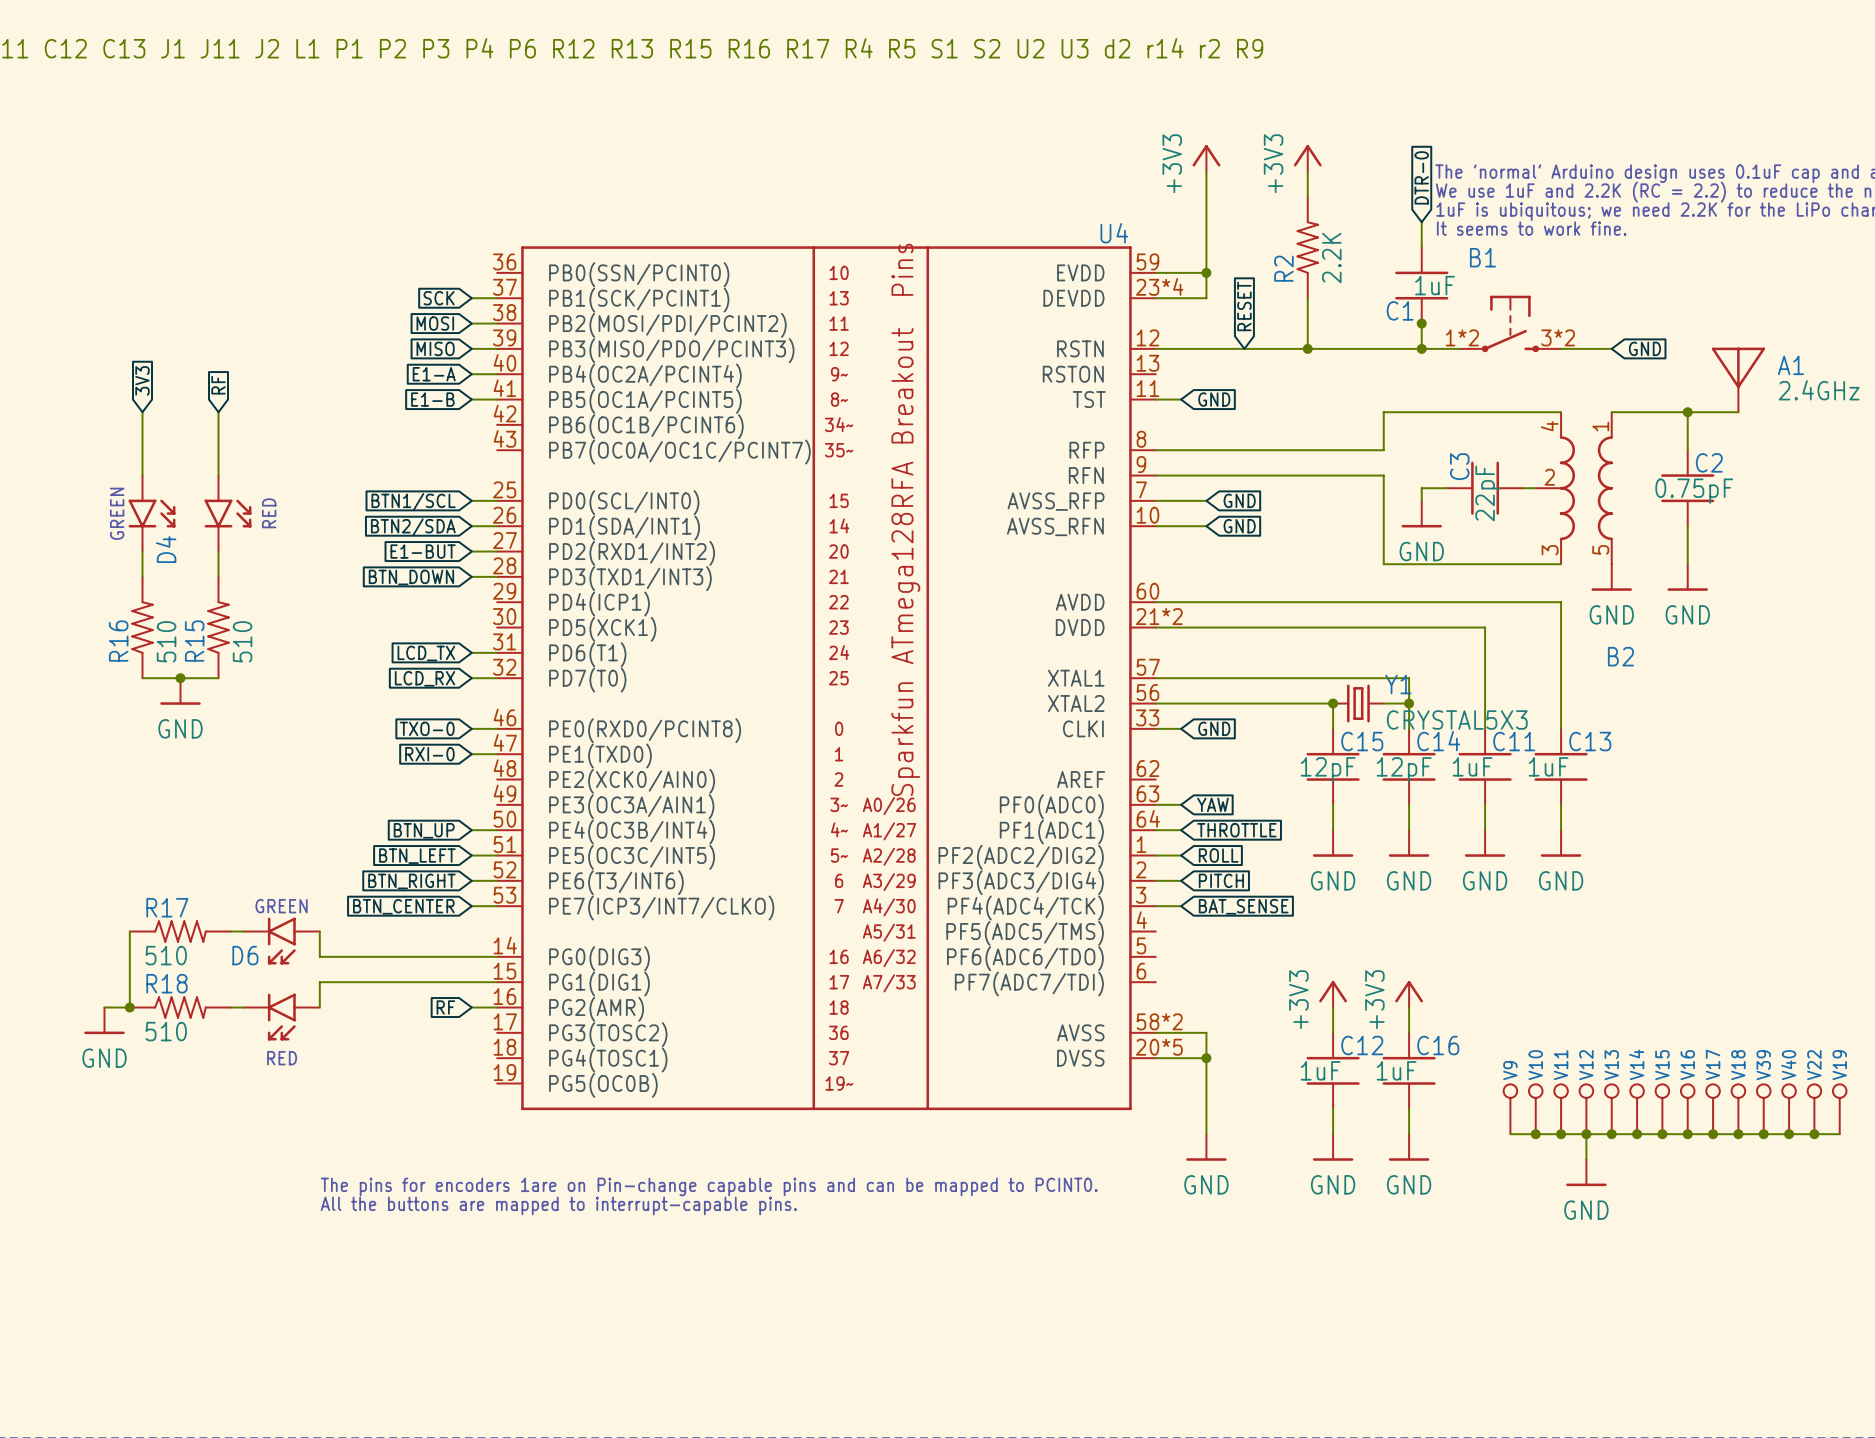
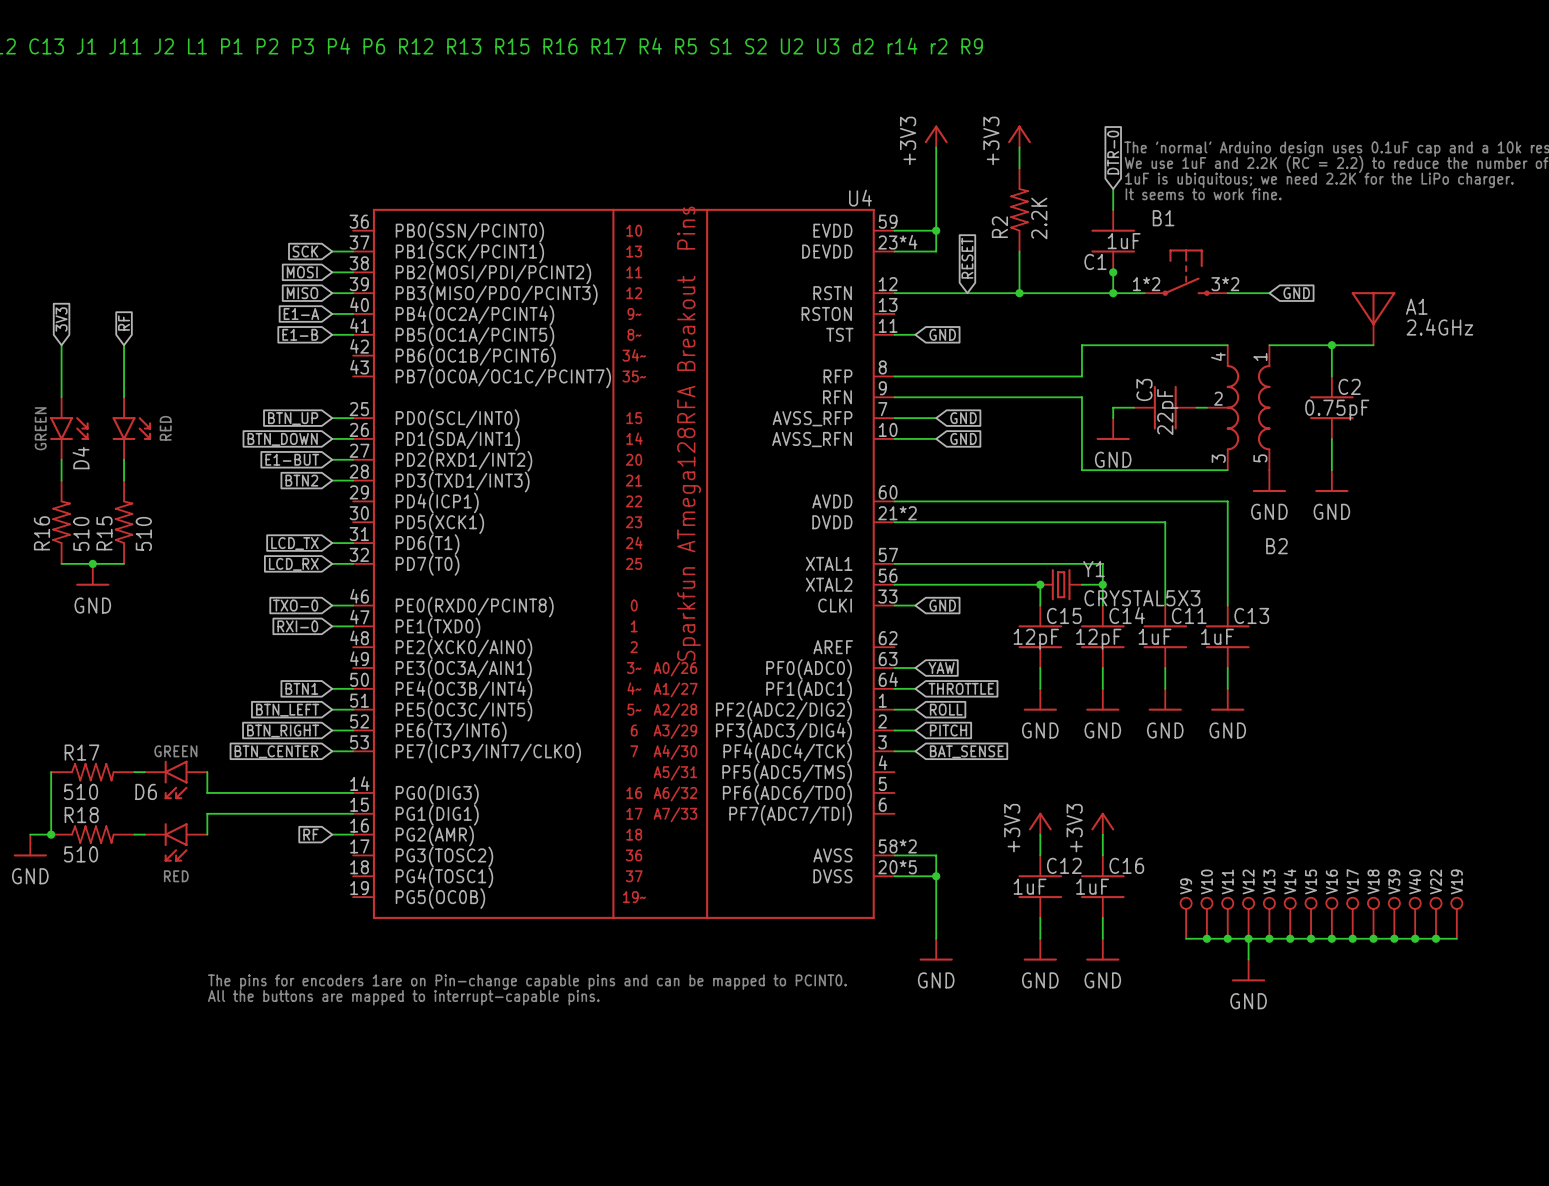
global label: BTN1/SCL (413, 502) -> BTN_UP (293, 418)
global label: BTN2/SDA (413, 527) -> BTN_DOWN (282, 439)
global label: BTN_DOWN (411, 577) -> BTN2 (301, 480)
global label: BTN_UP (424, 830) -> BTN1 (301, 688)

